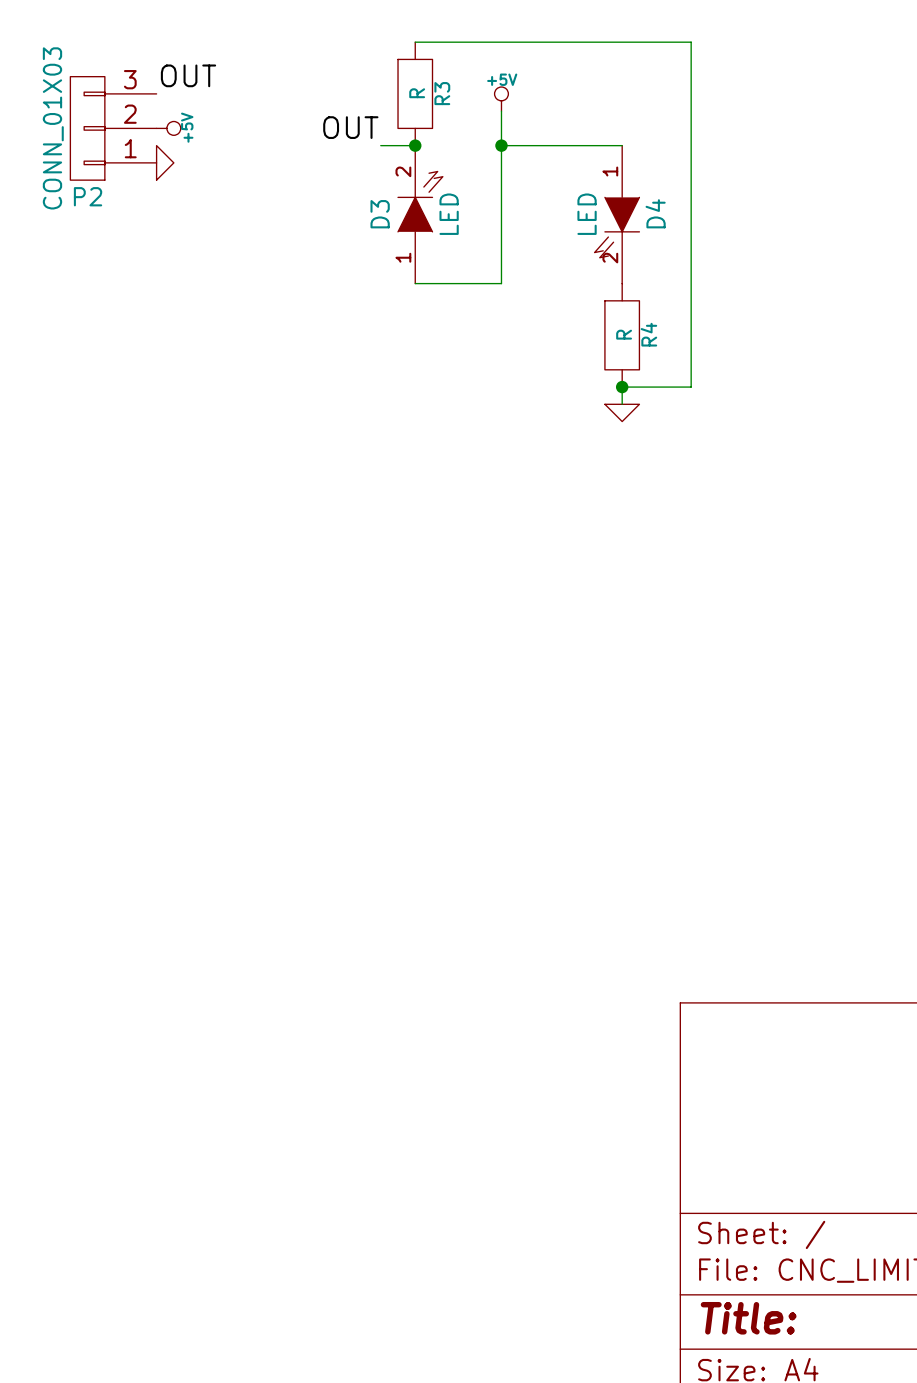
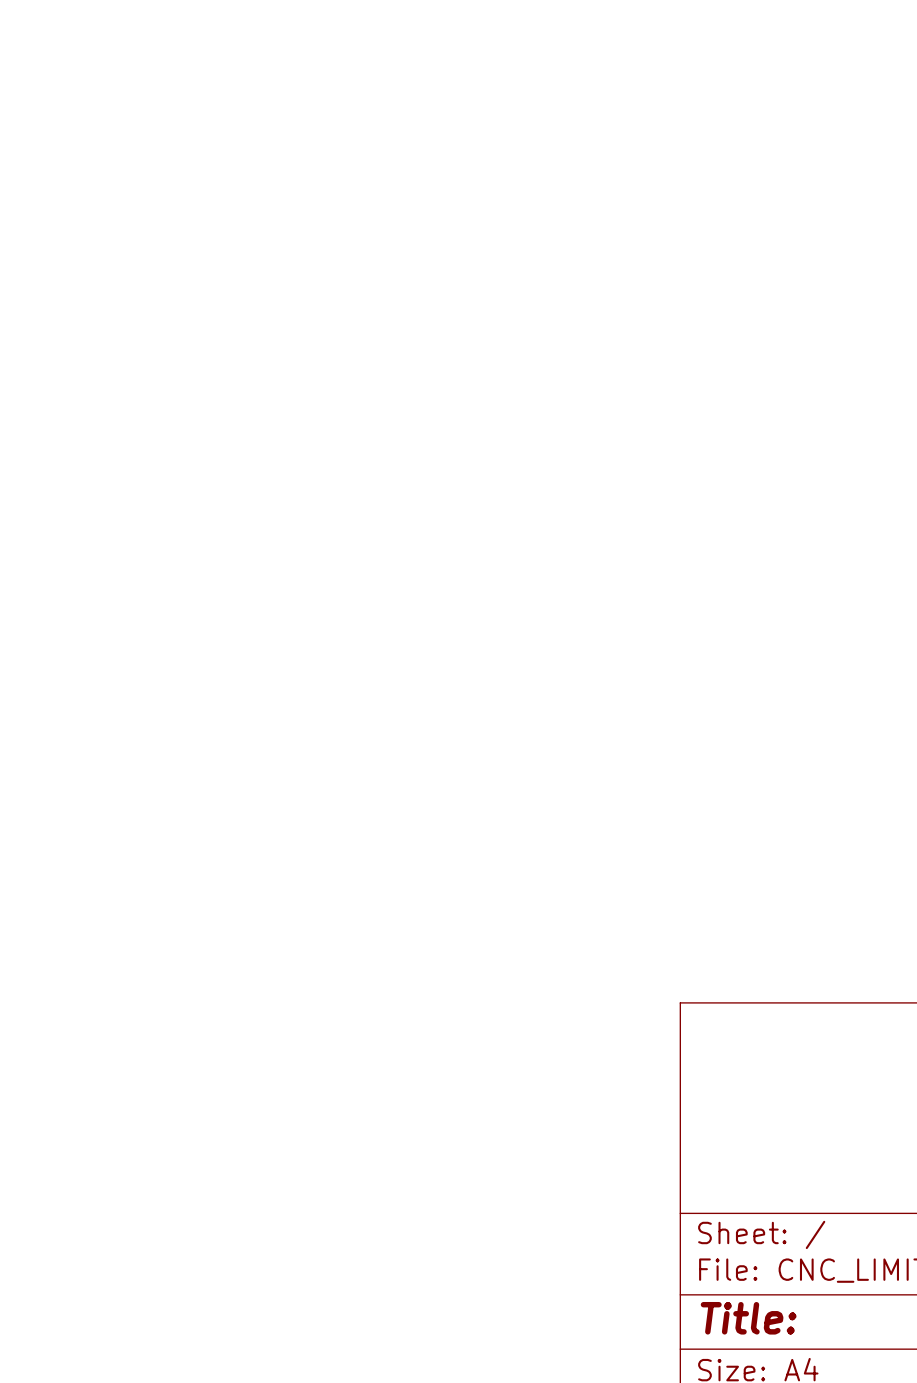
wire: (415, 42) (691, 42) (691, 387) (622, 387) (622, 404) -> none
label: OUT (188, 75) -> none
R3: R (415, 93) -> none
power symbol: +5V (501, 99) -> none
wire: (501, 111) (501, 283) (415, 283) -> none
label: OUT (350, 127) -> none
P2: CONN_01X03 (113, 128) -> none
power symbol: +5V (168, 128) -> none
wire: (380, 145) (415, 145) -> none
junction: (415, 145) -> none
wire: (501, 145) (622, 145) -> none
junction: (501, 145) -> none
power symbol: (165, 162) -> none
D3: LED (420, 214) -> none
D4: LED (617, 214) -> none
R4: R (622, 335) -> none
junction: (622, 387) -> none
power symbol: (622, 412) -> none

